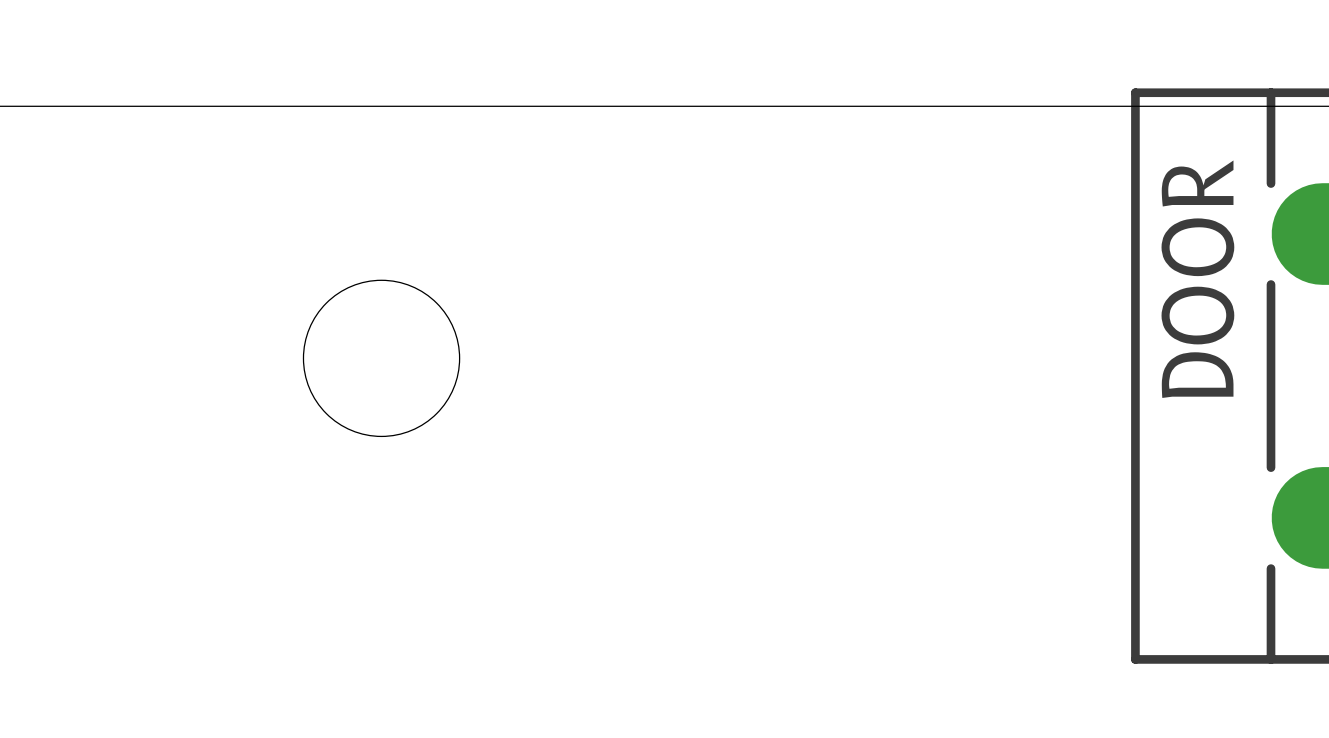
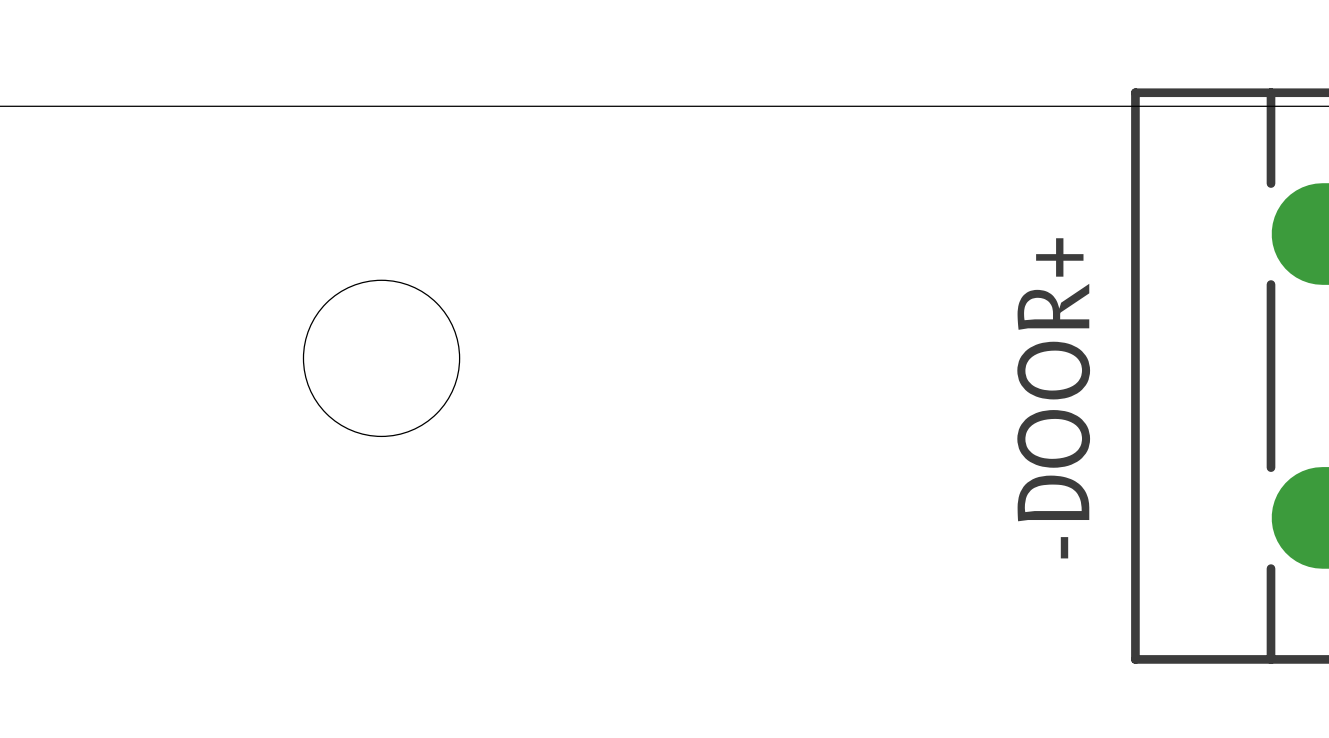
DOOR name: DOOR (1197, 279) -> -DOOR+ (1053, 398)

